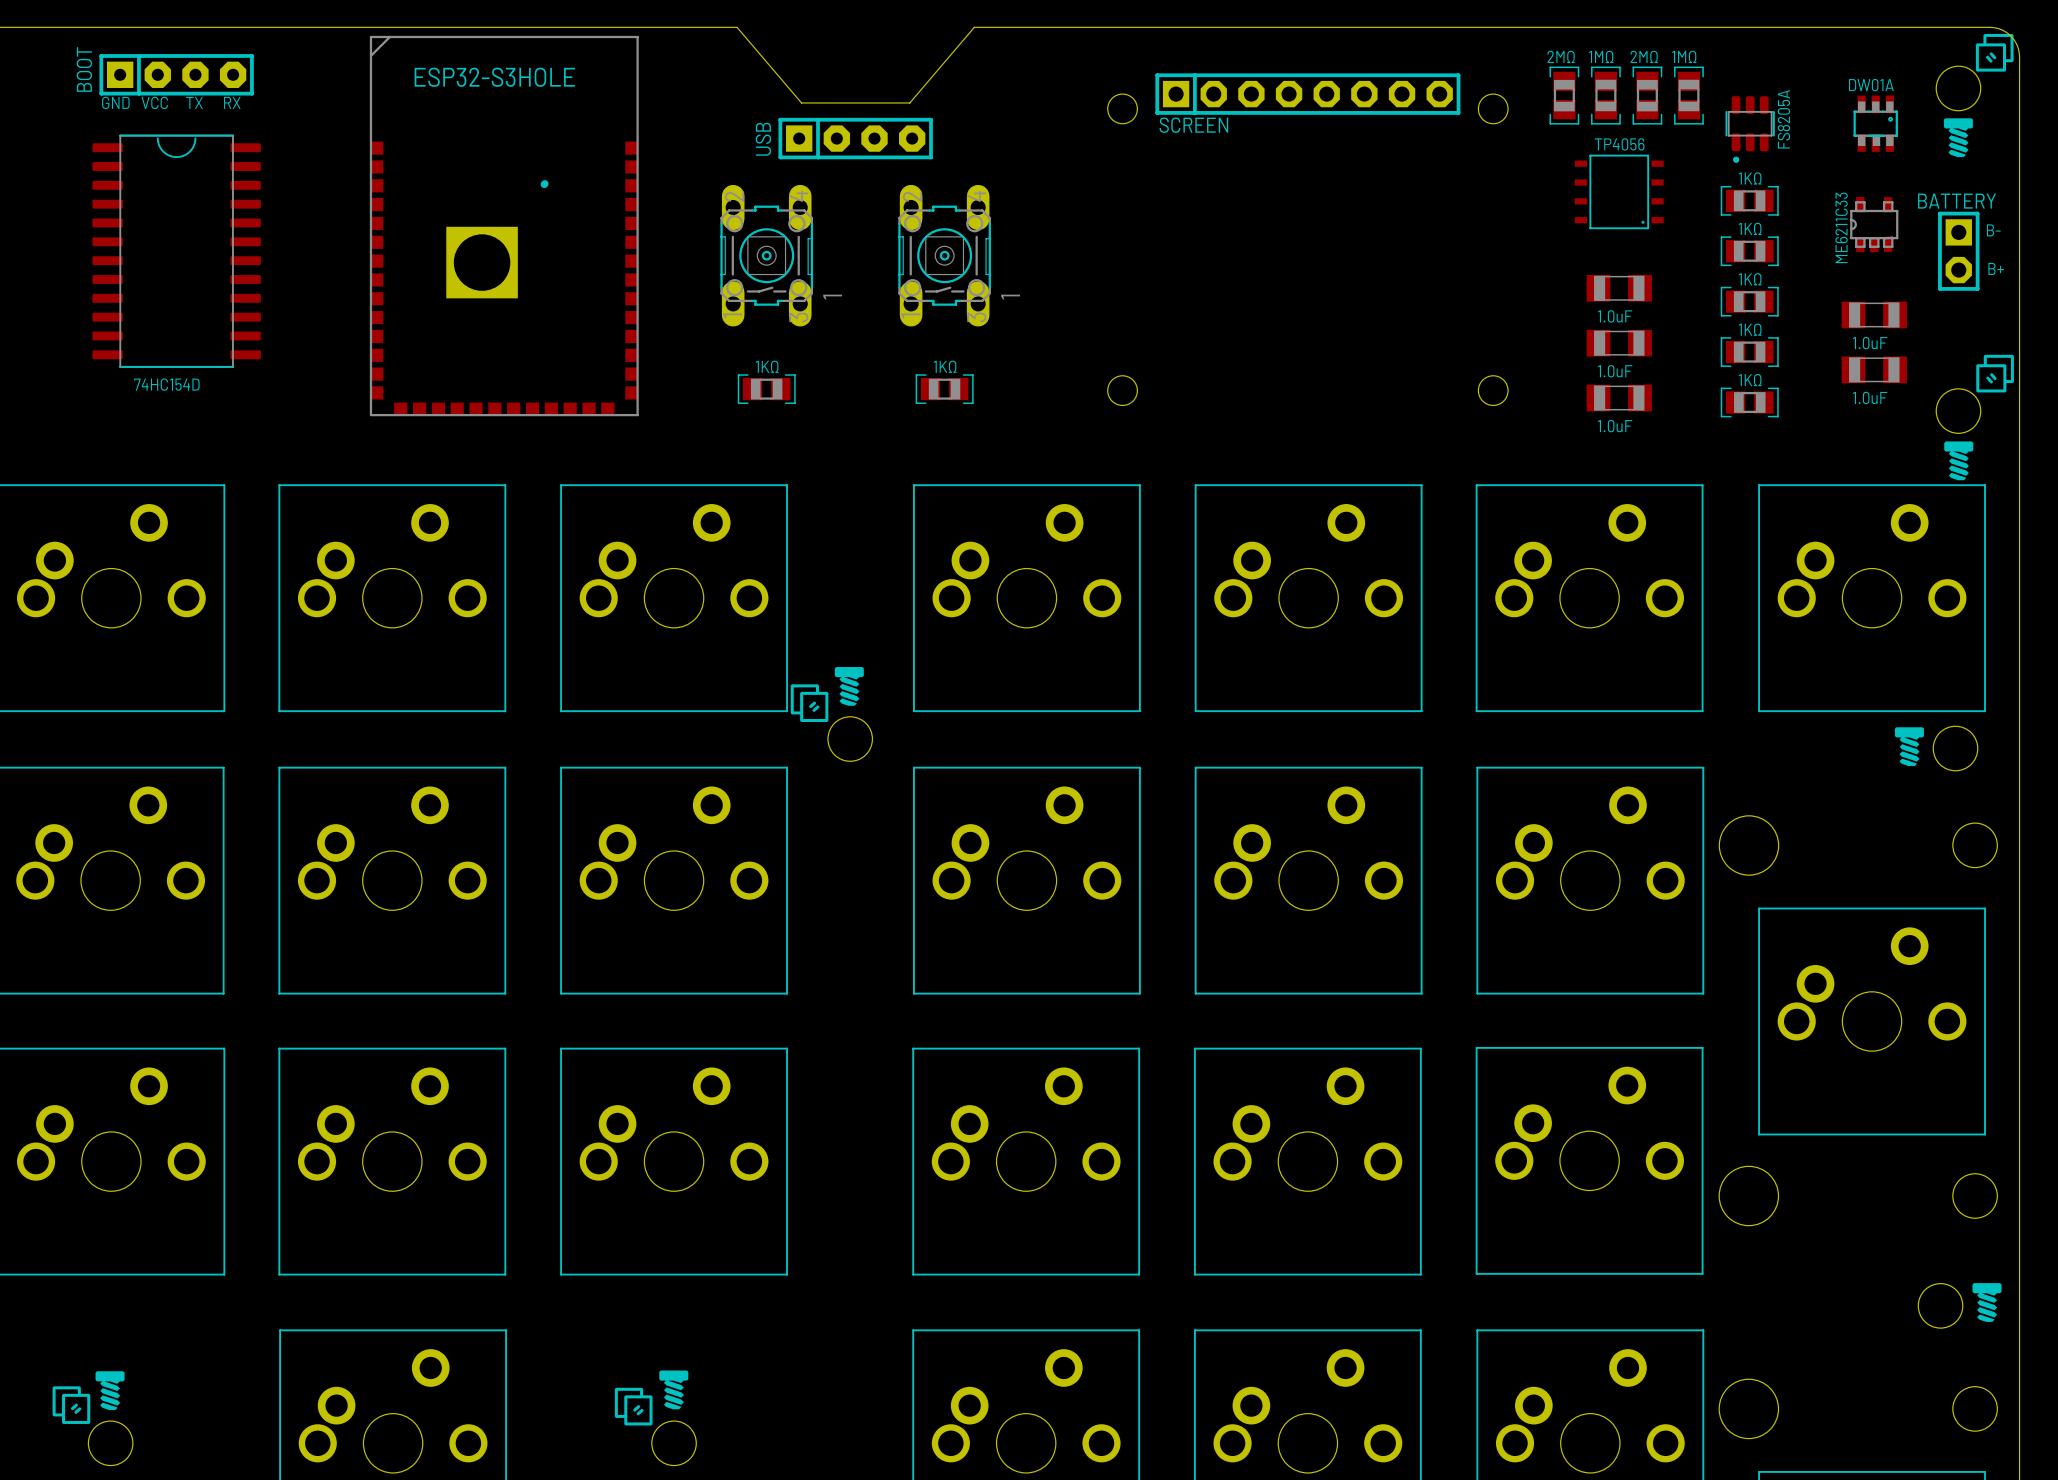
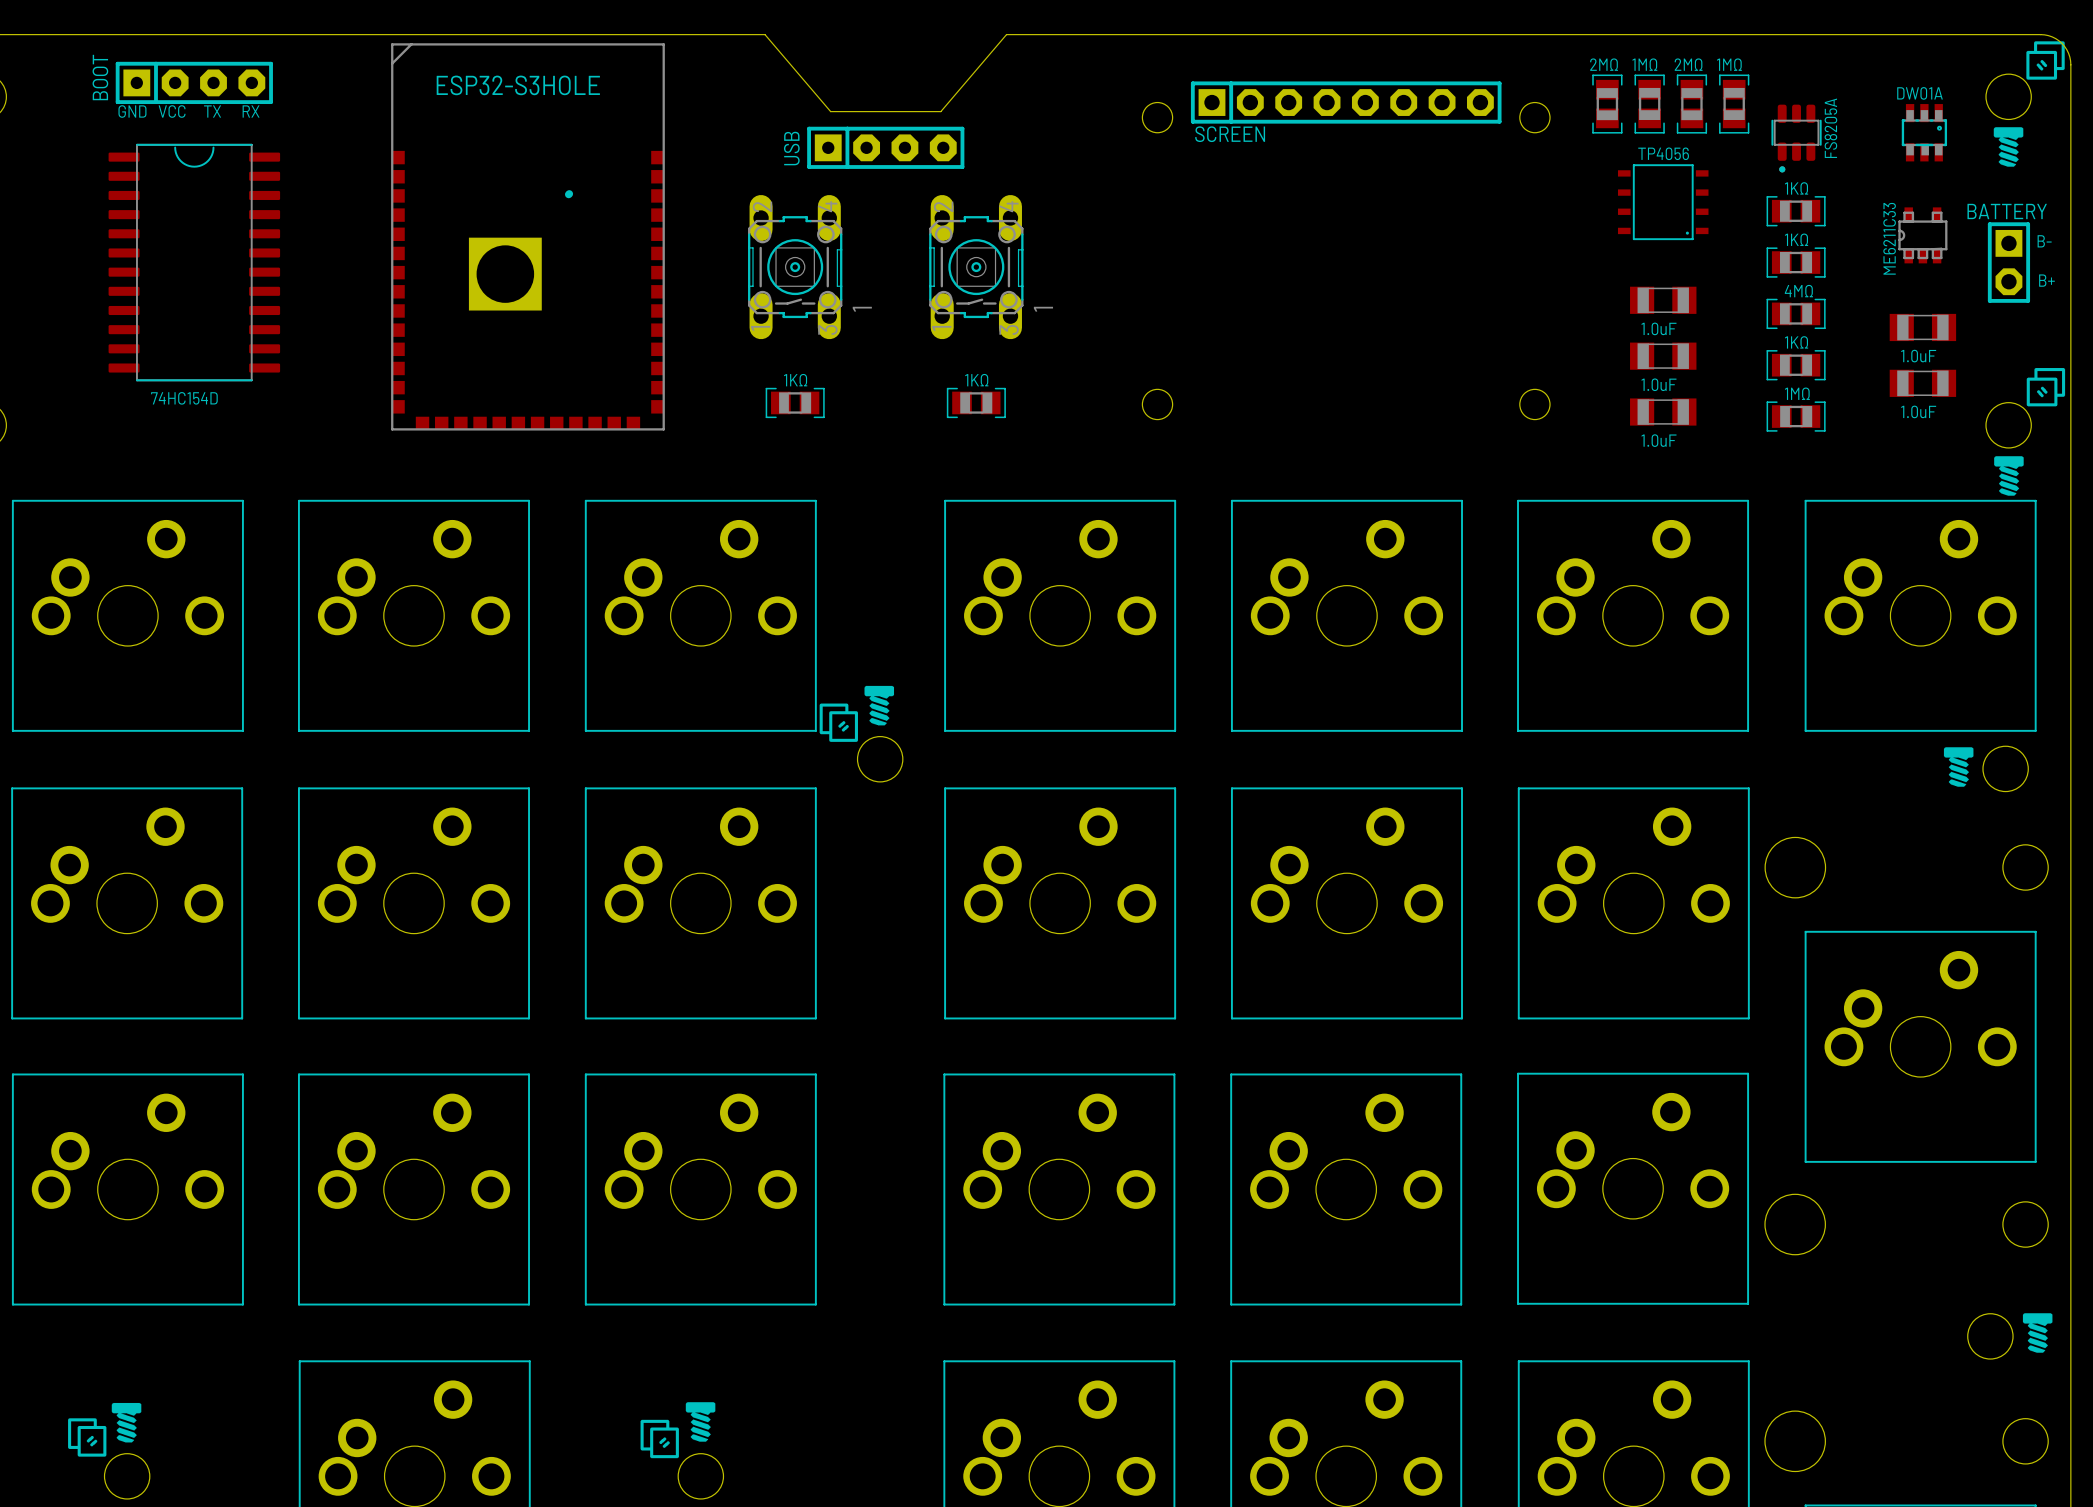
text: 1KΩ (1750, 279) -> 4MΩ (1798, 291)
text: 1KΩ (1750, 380) -> 1MΩ (1797, 393)

